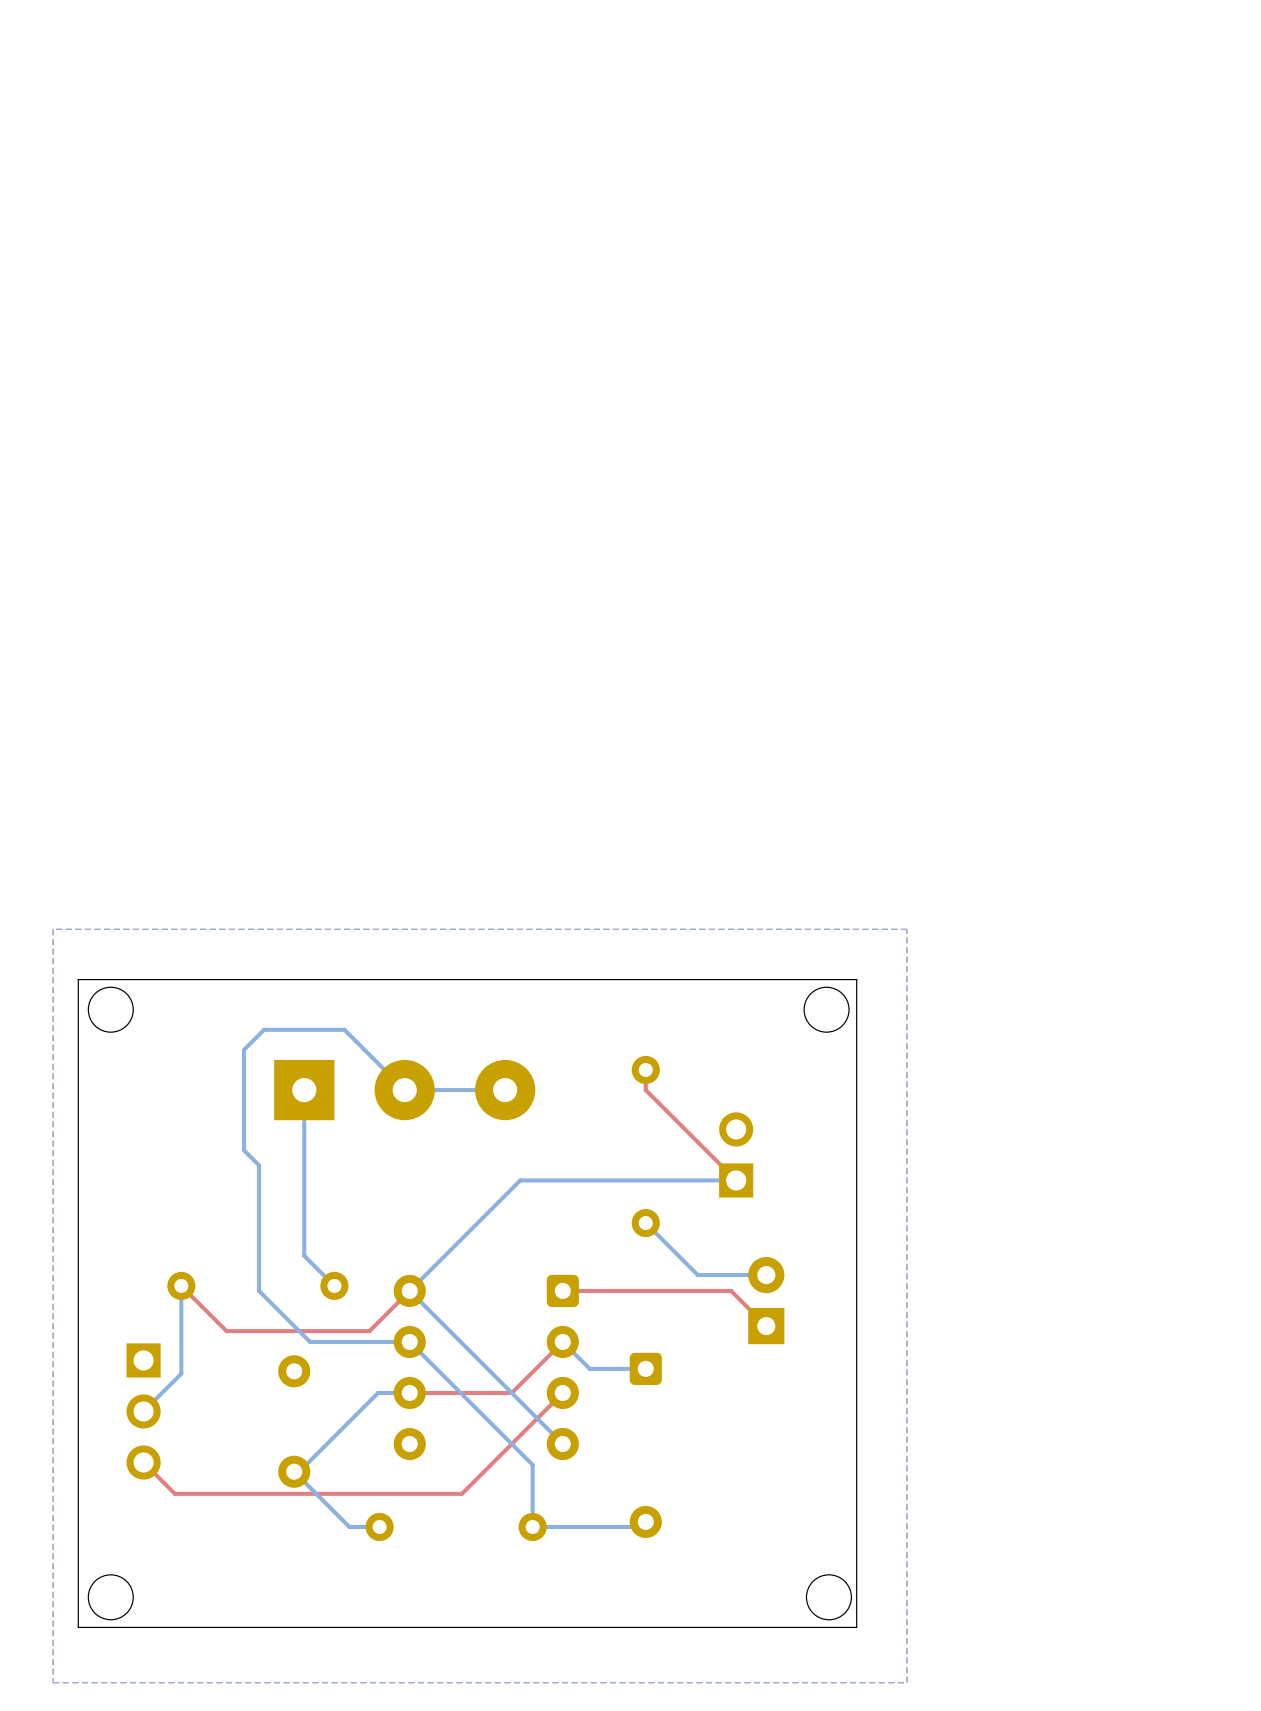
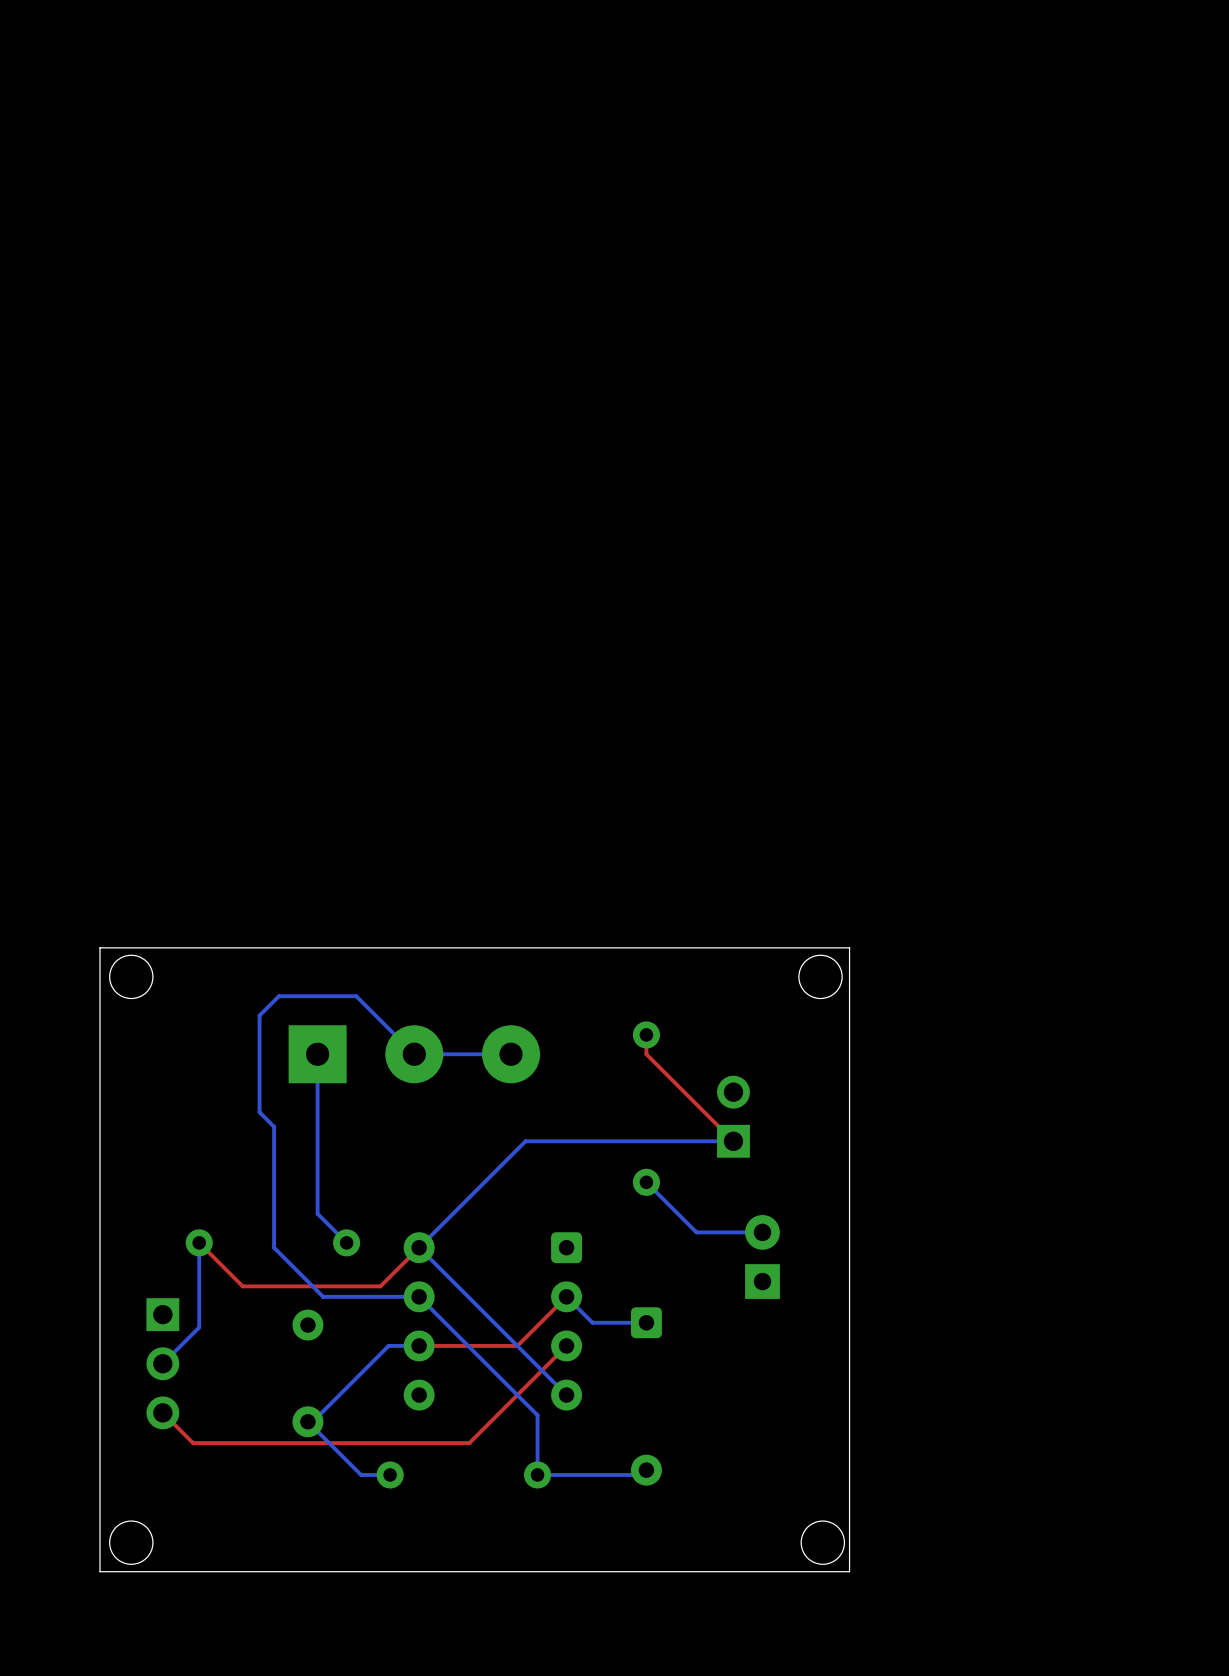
bottom zone outline: (906, 929) (53, 929) (53, 1682) (906, 1682) (906, 929) -> none
top track: (562, 1290) (731, 1290) (766, 1326) -> none

